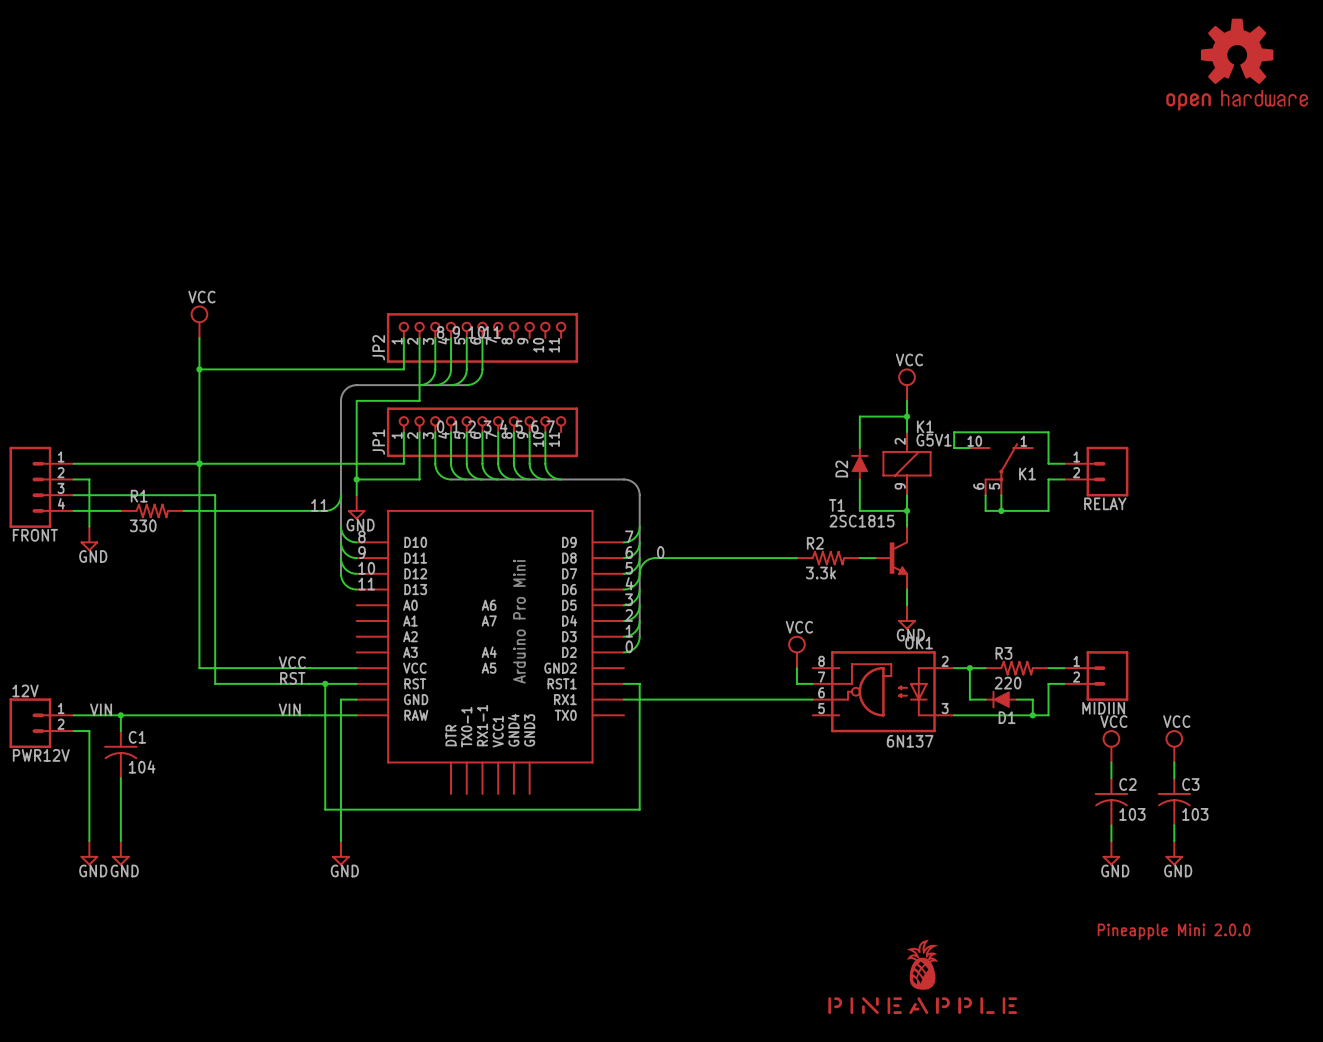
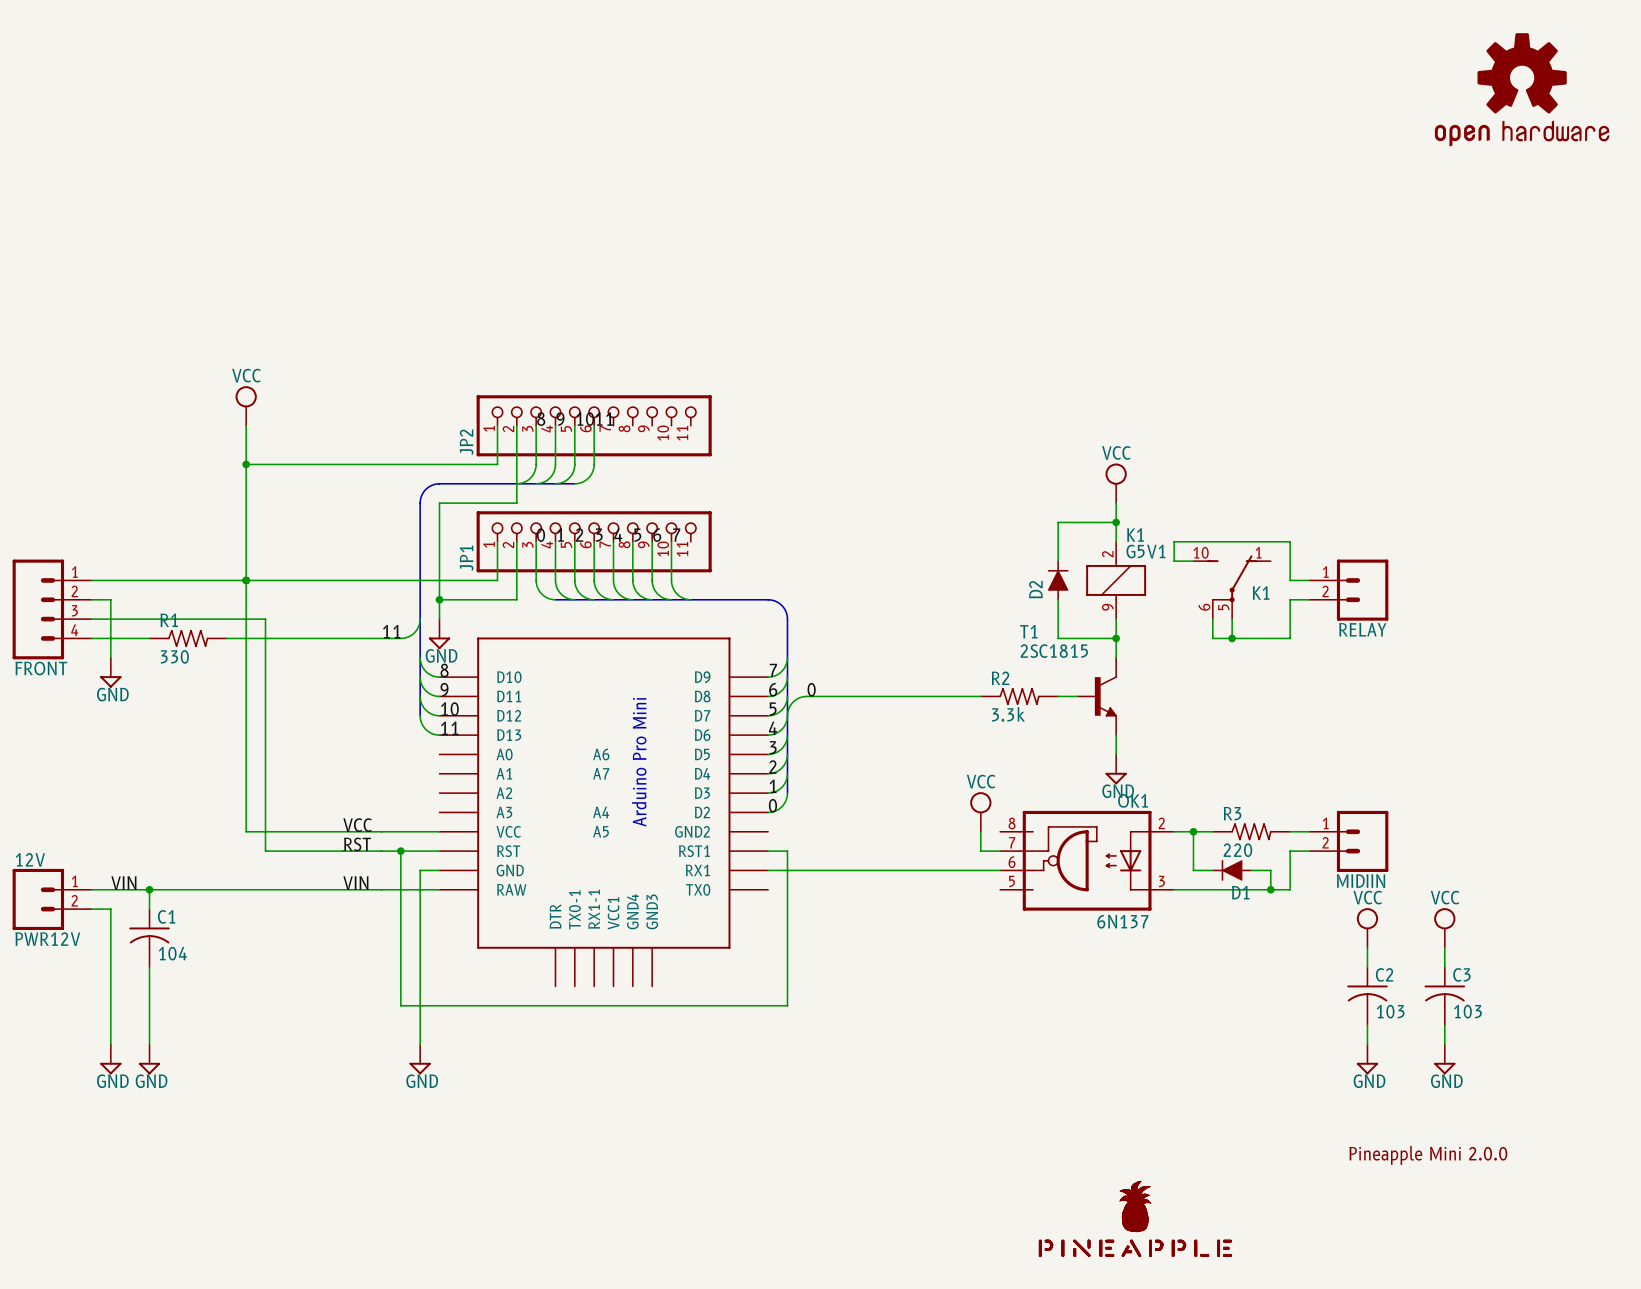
part: (922, 976) -> none
part: none -> (1135, 1218)

